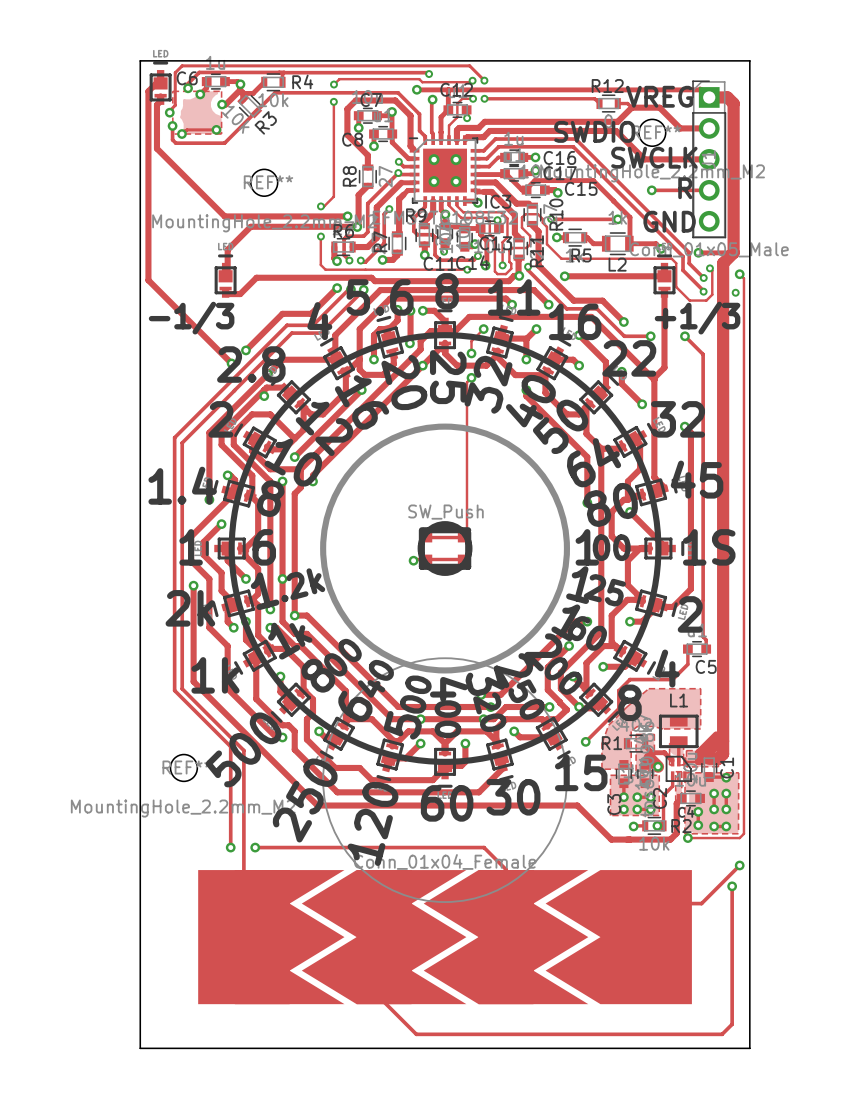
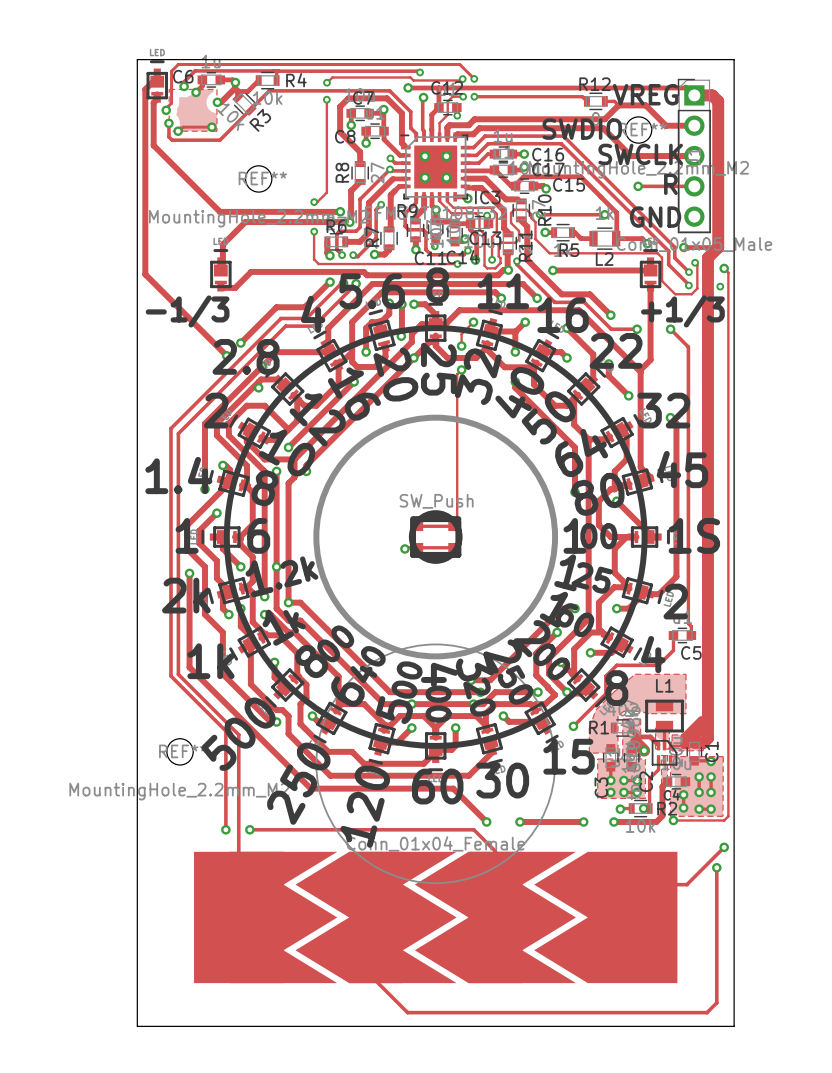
track: (463, 805) (577, 805) (611, 839) (627, 839) -> (453, 788) (486, 821)
via: none -> (486, 821)
track: none -> (520, 821) (583, 821)
via: none -> (520, 821)
via: none -> (583, 821)
via: none -> (613, 821)

